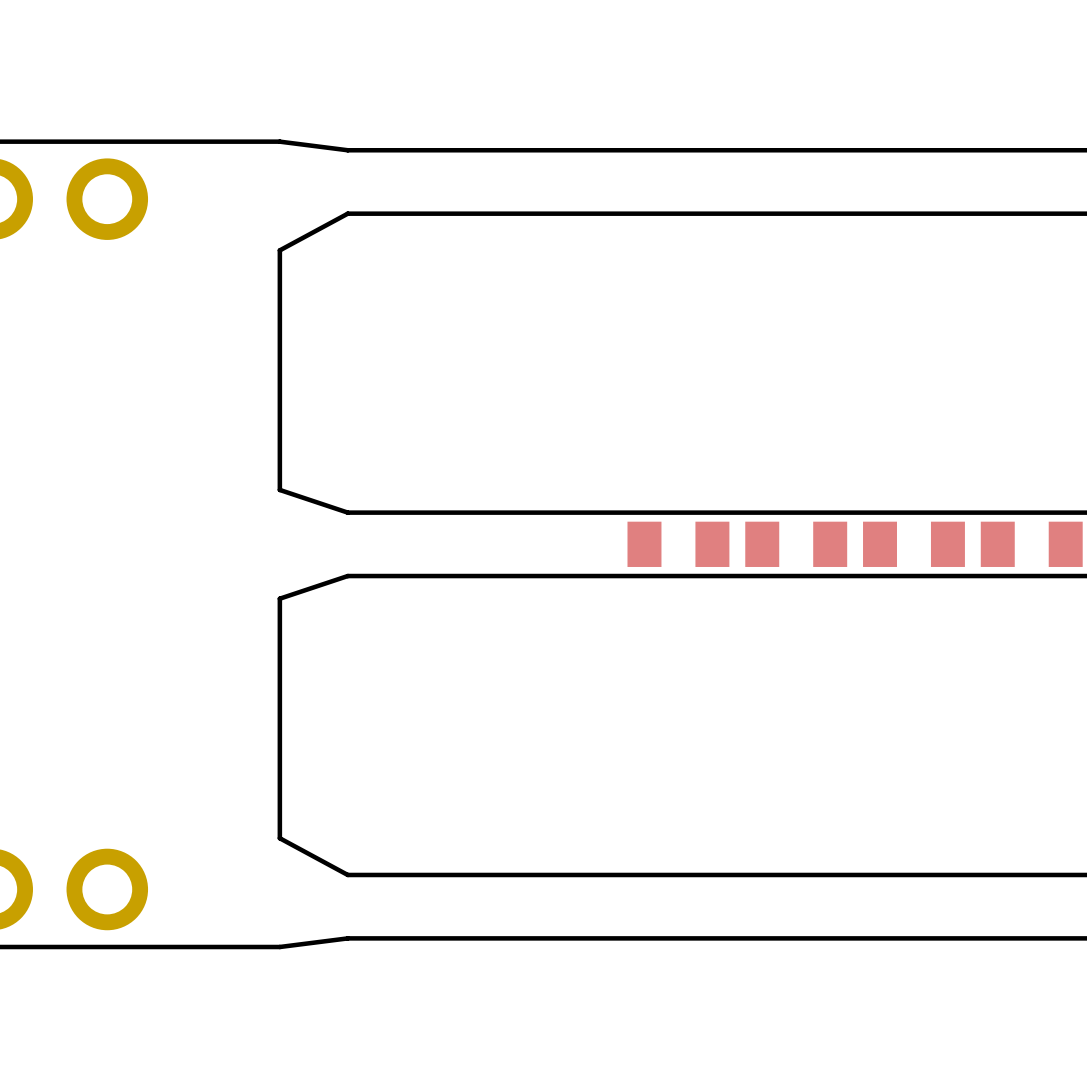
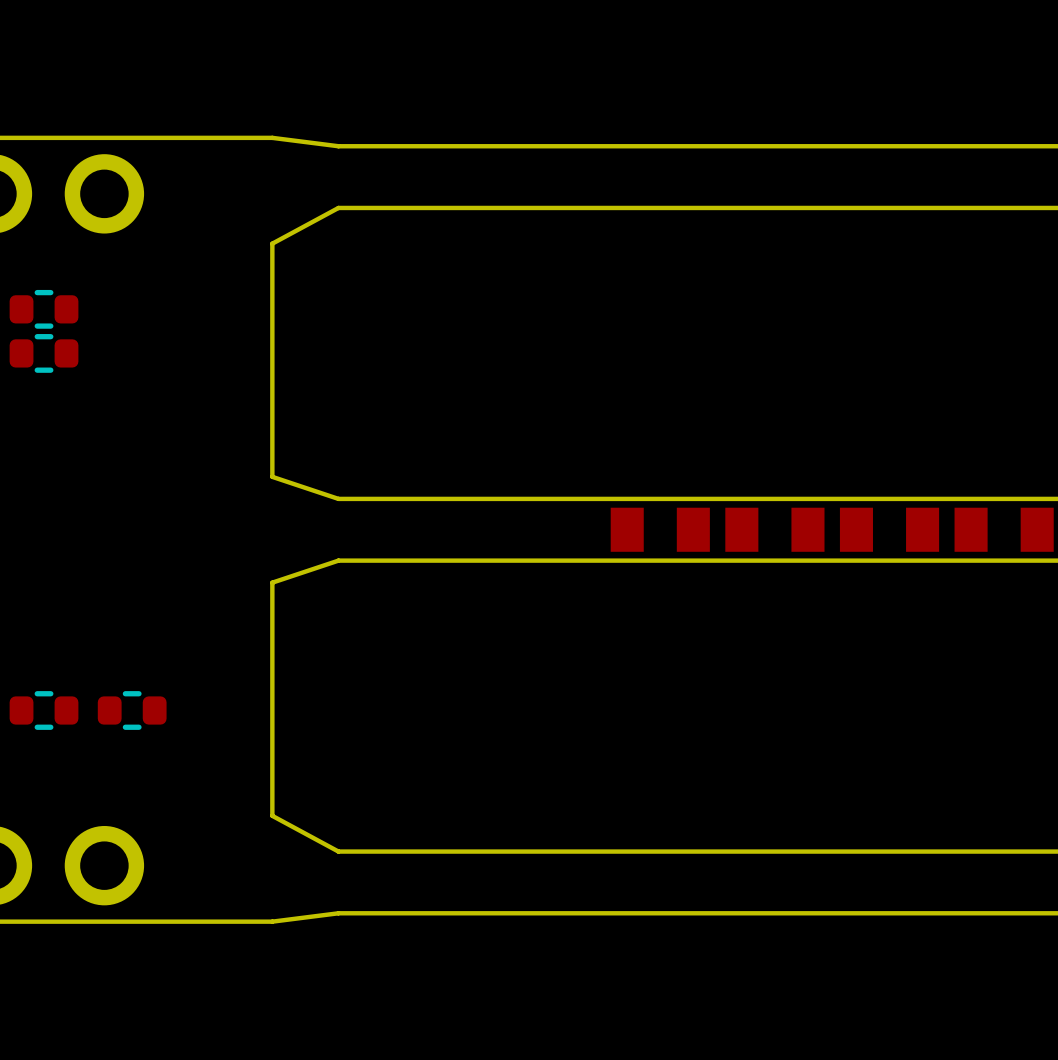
part: none -> (44, 309)
part: none -> (44, 353)
part: none -> (44, 710)
part: none -> (132, 710)

